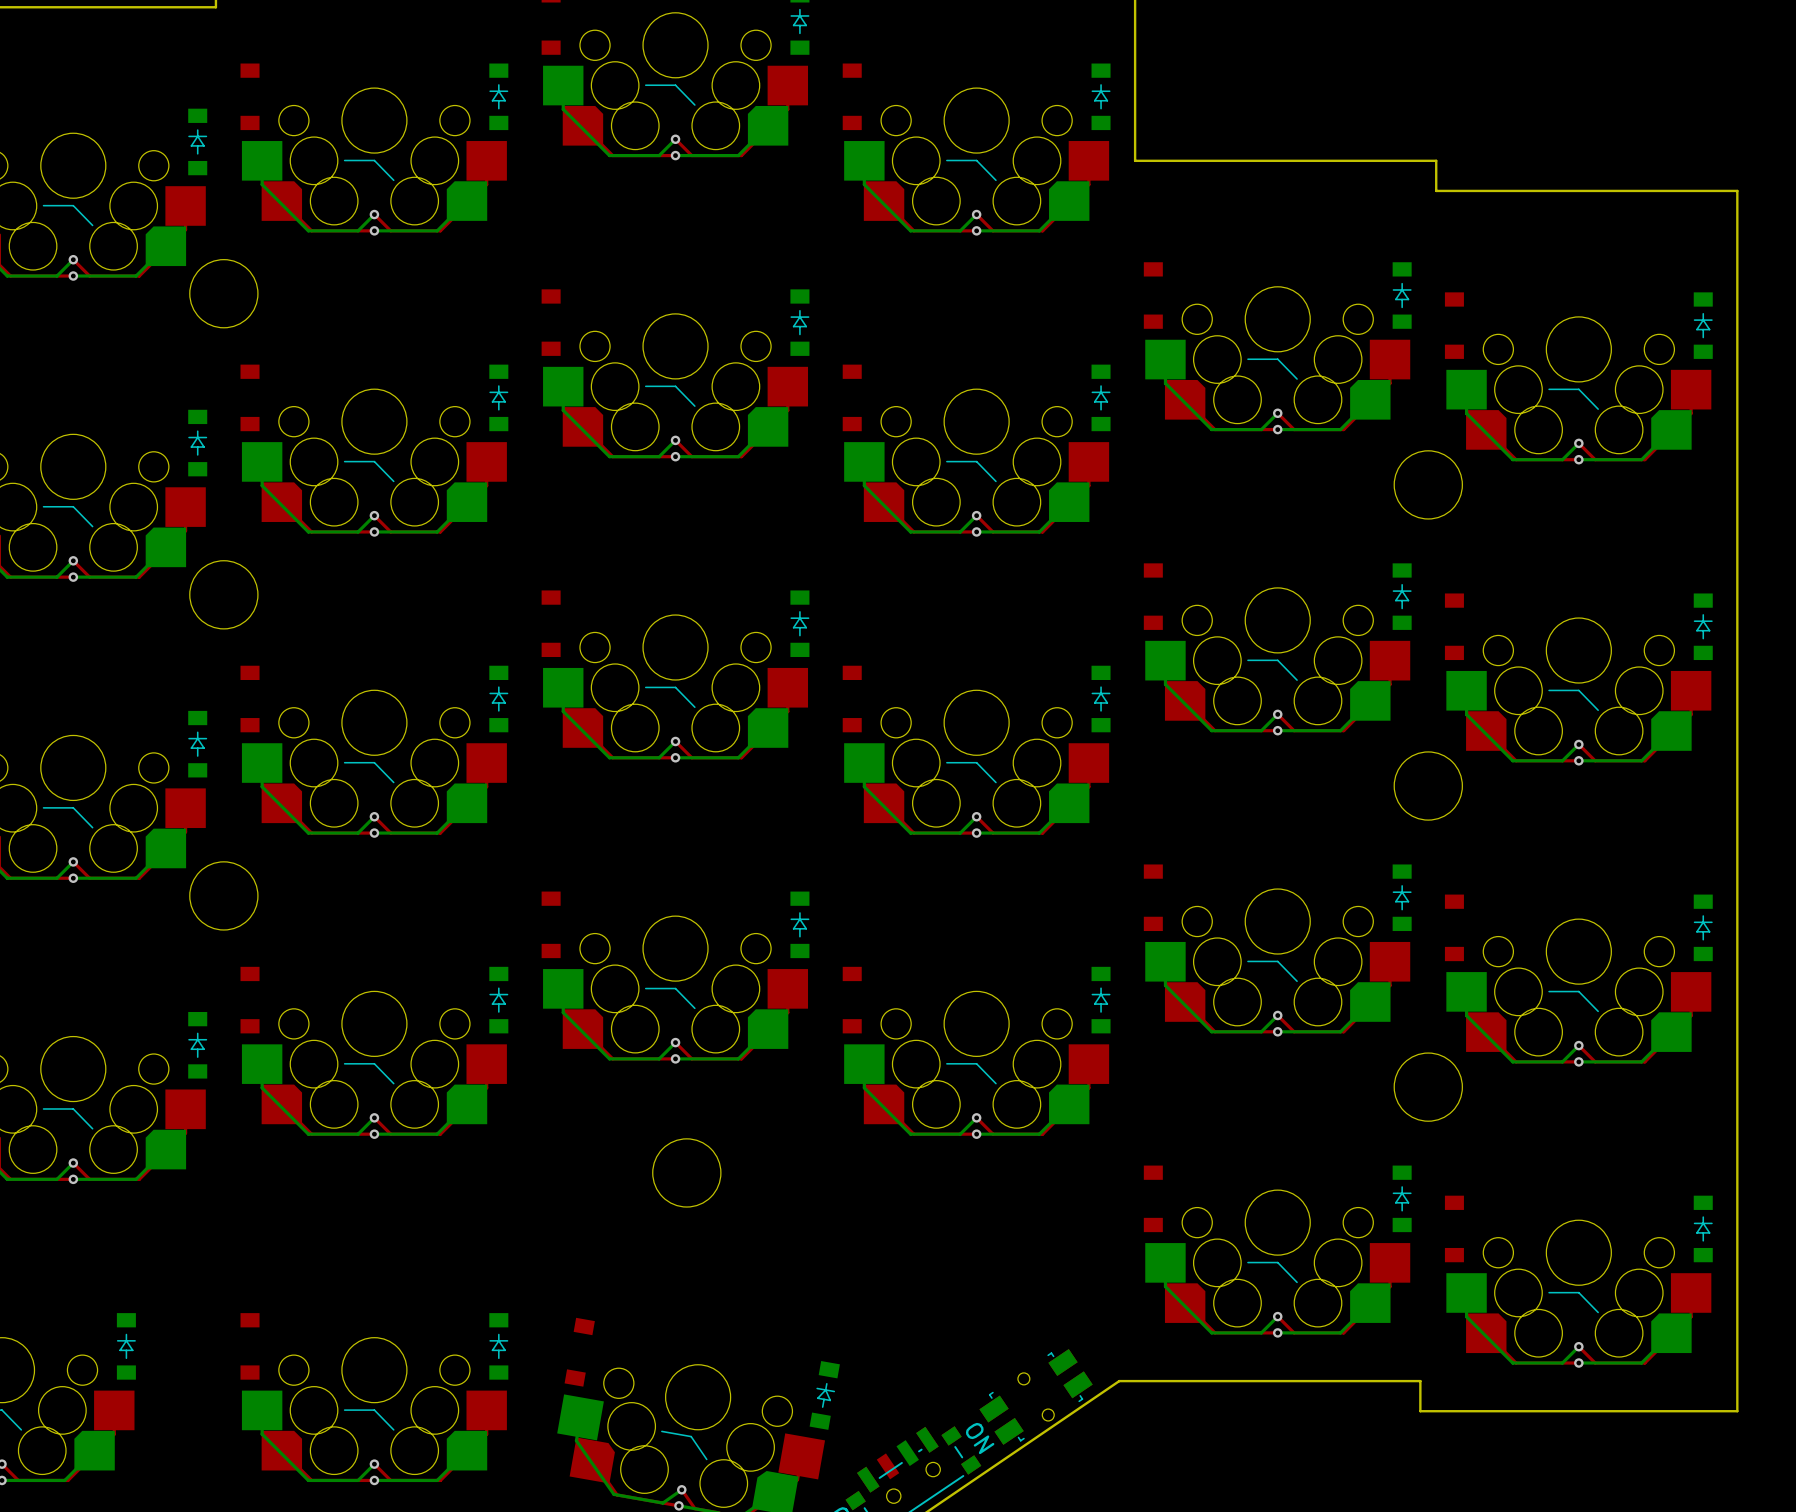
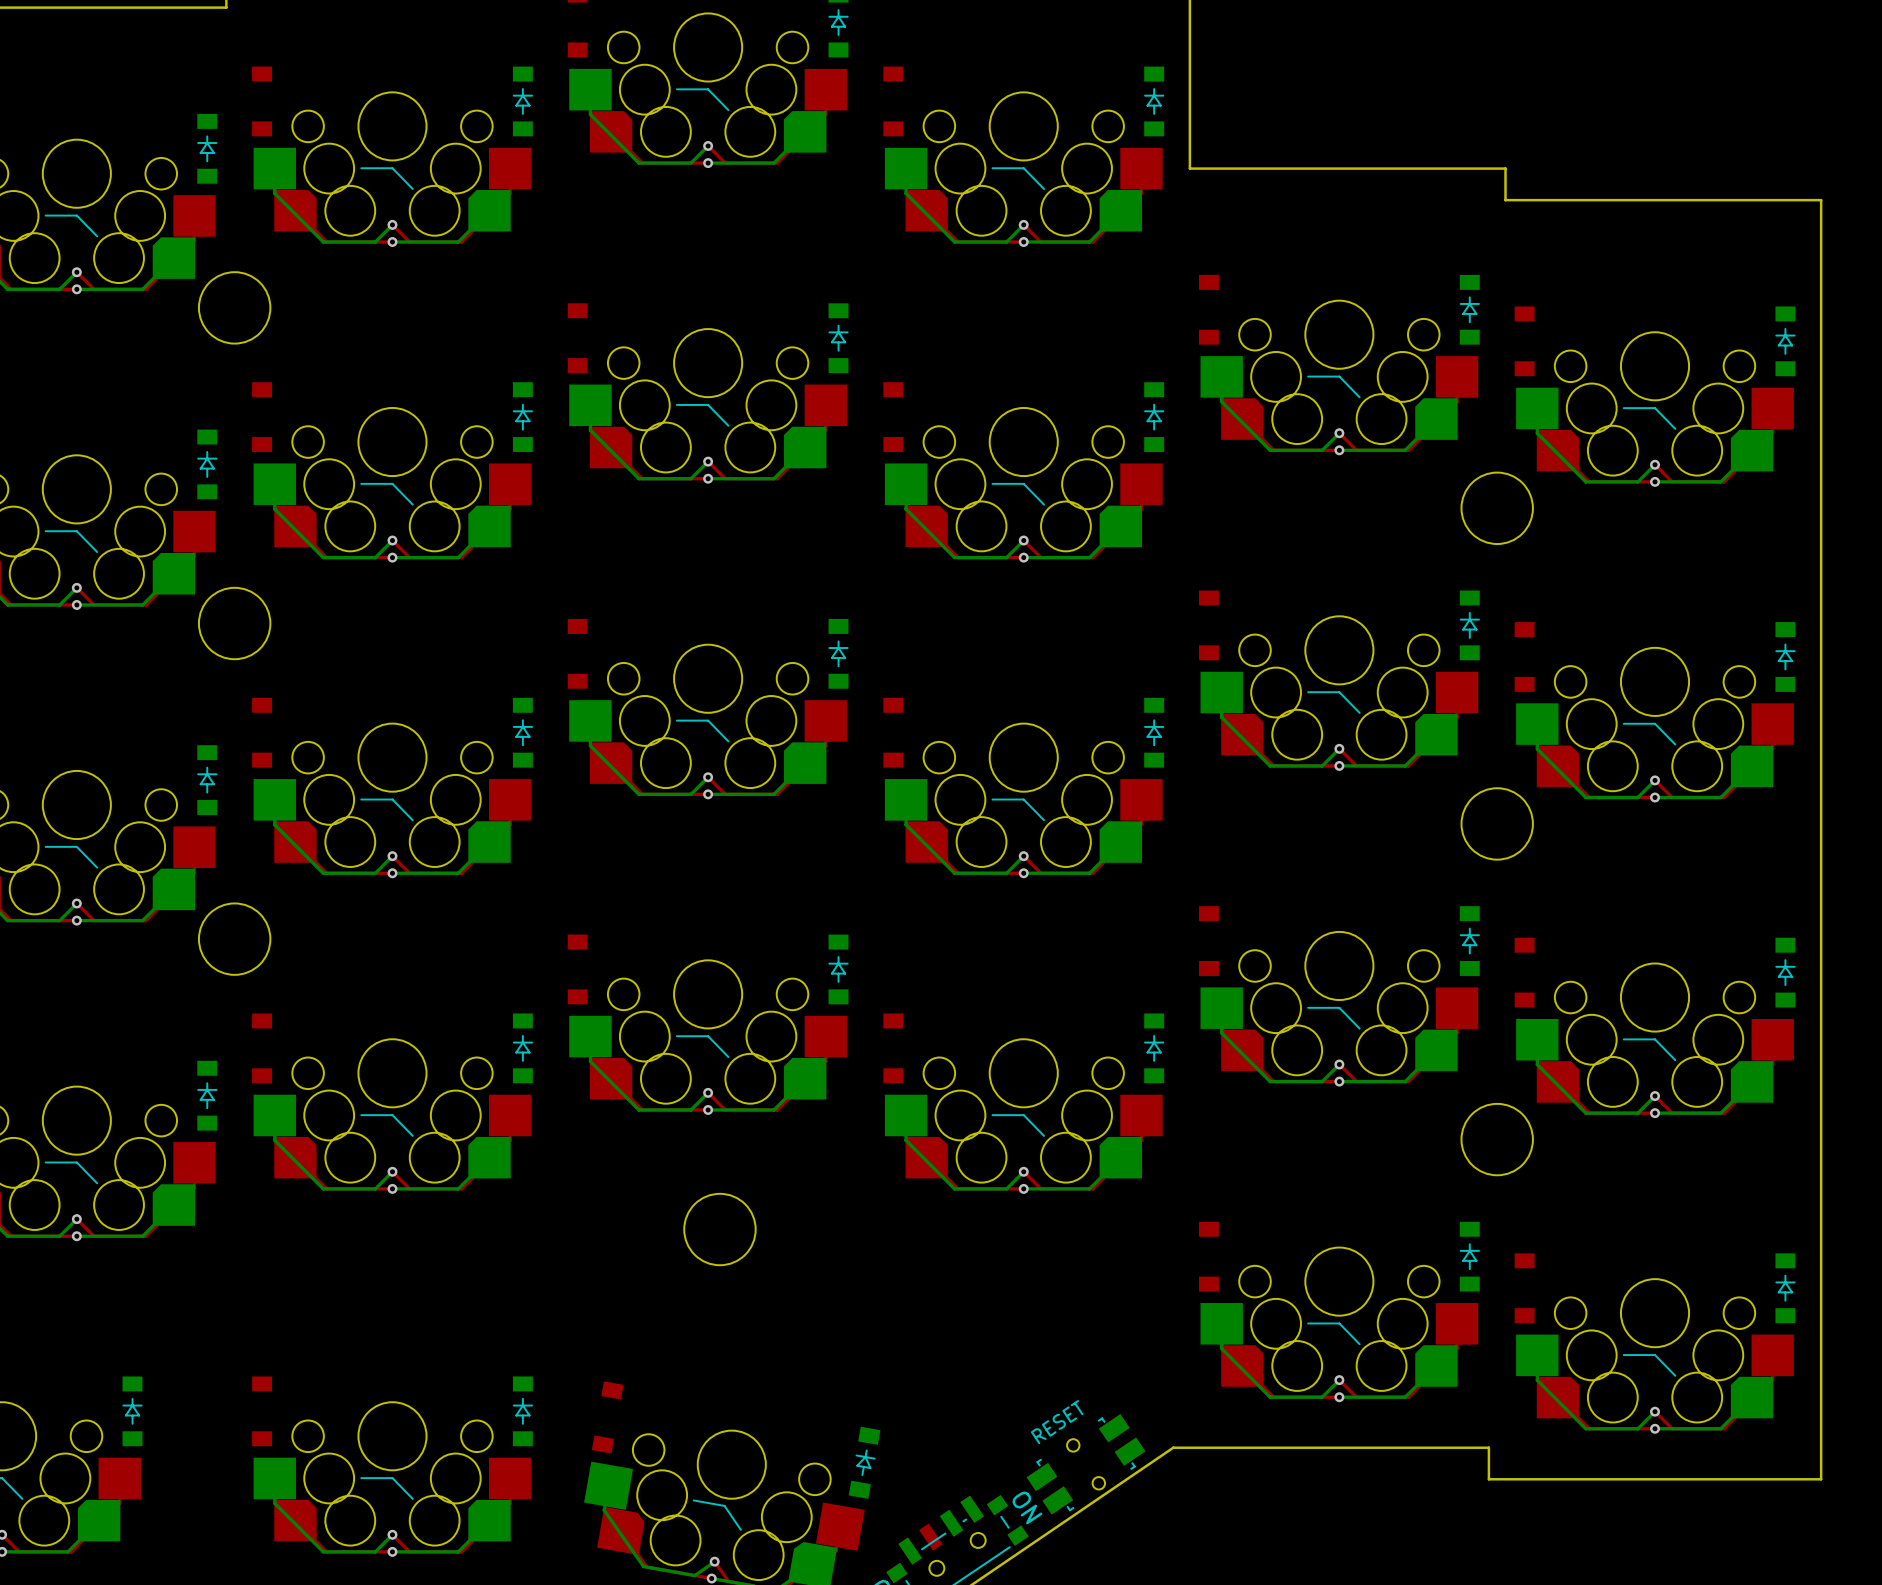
part text: none -> RESET (1057, 1422)

